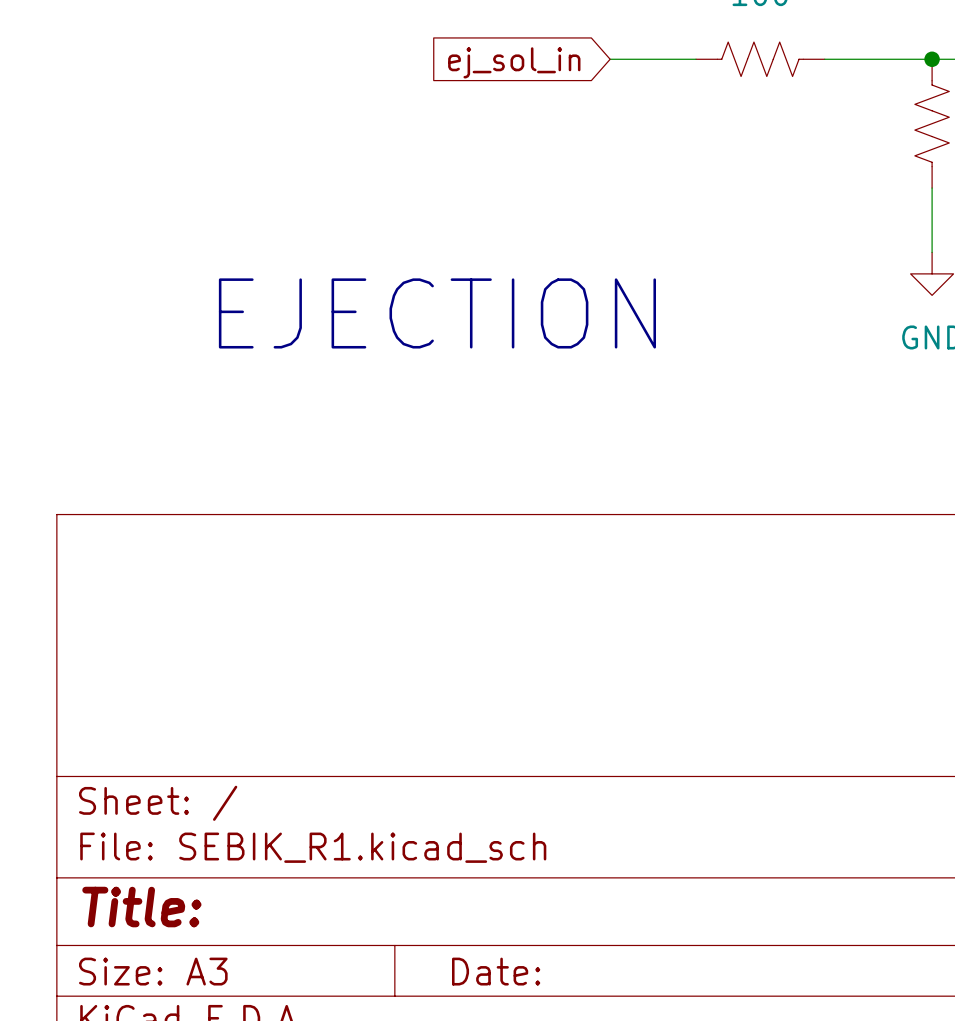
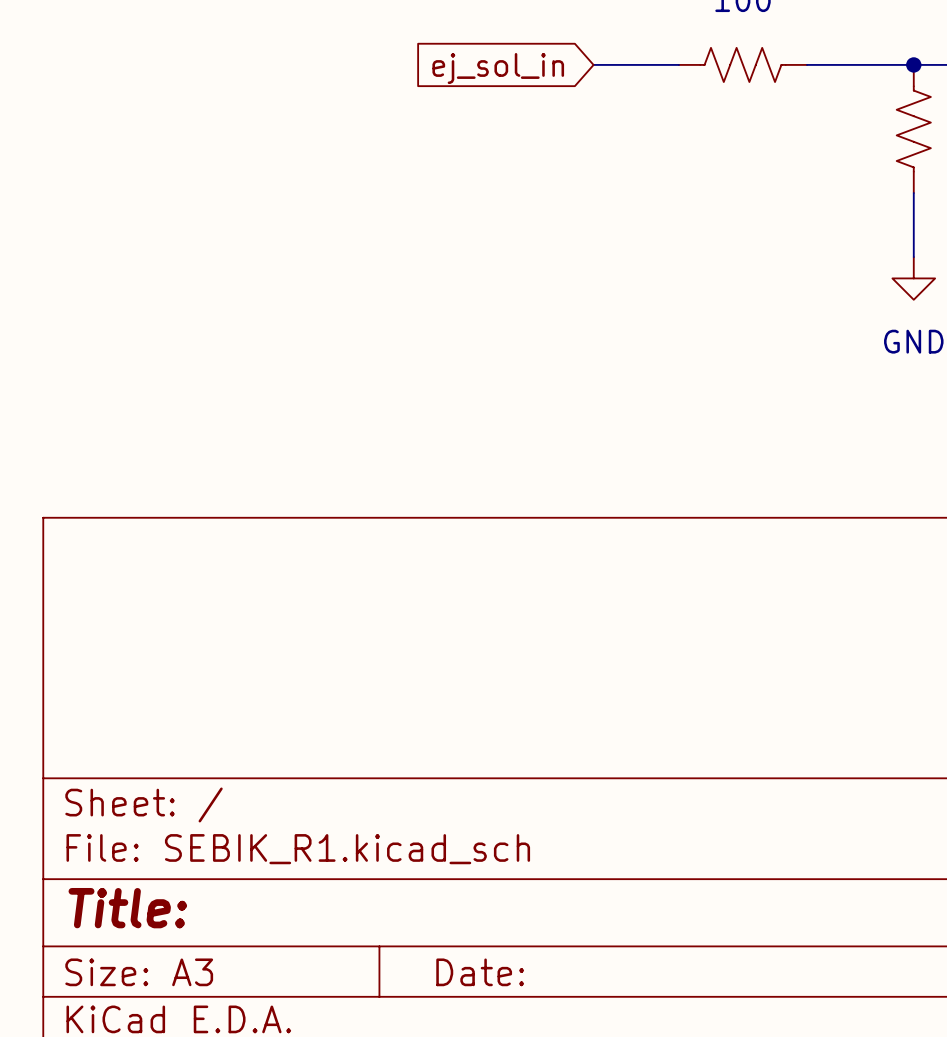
text: EJECTION (437, 313) -> none

